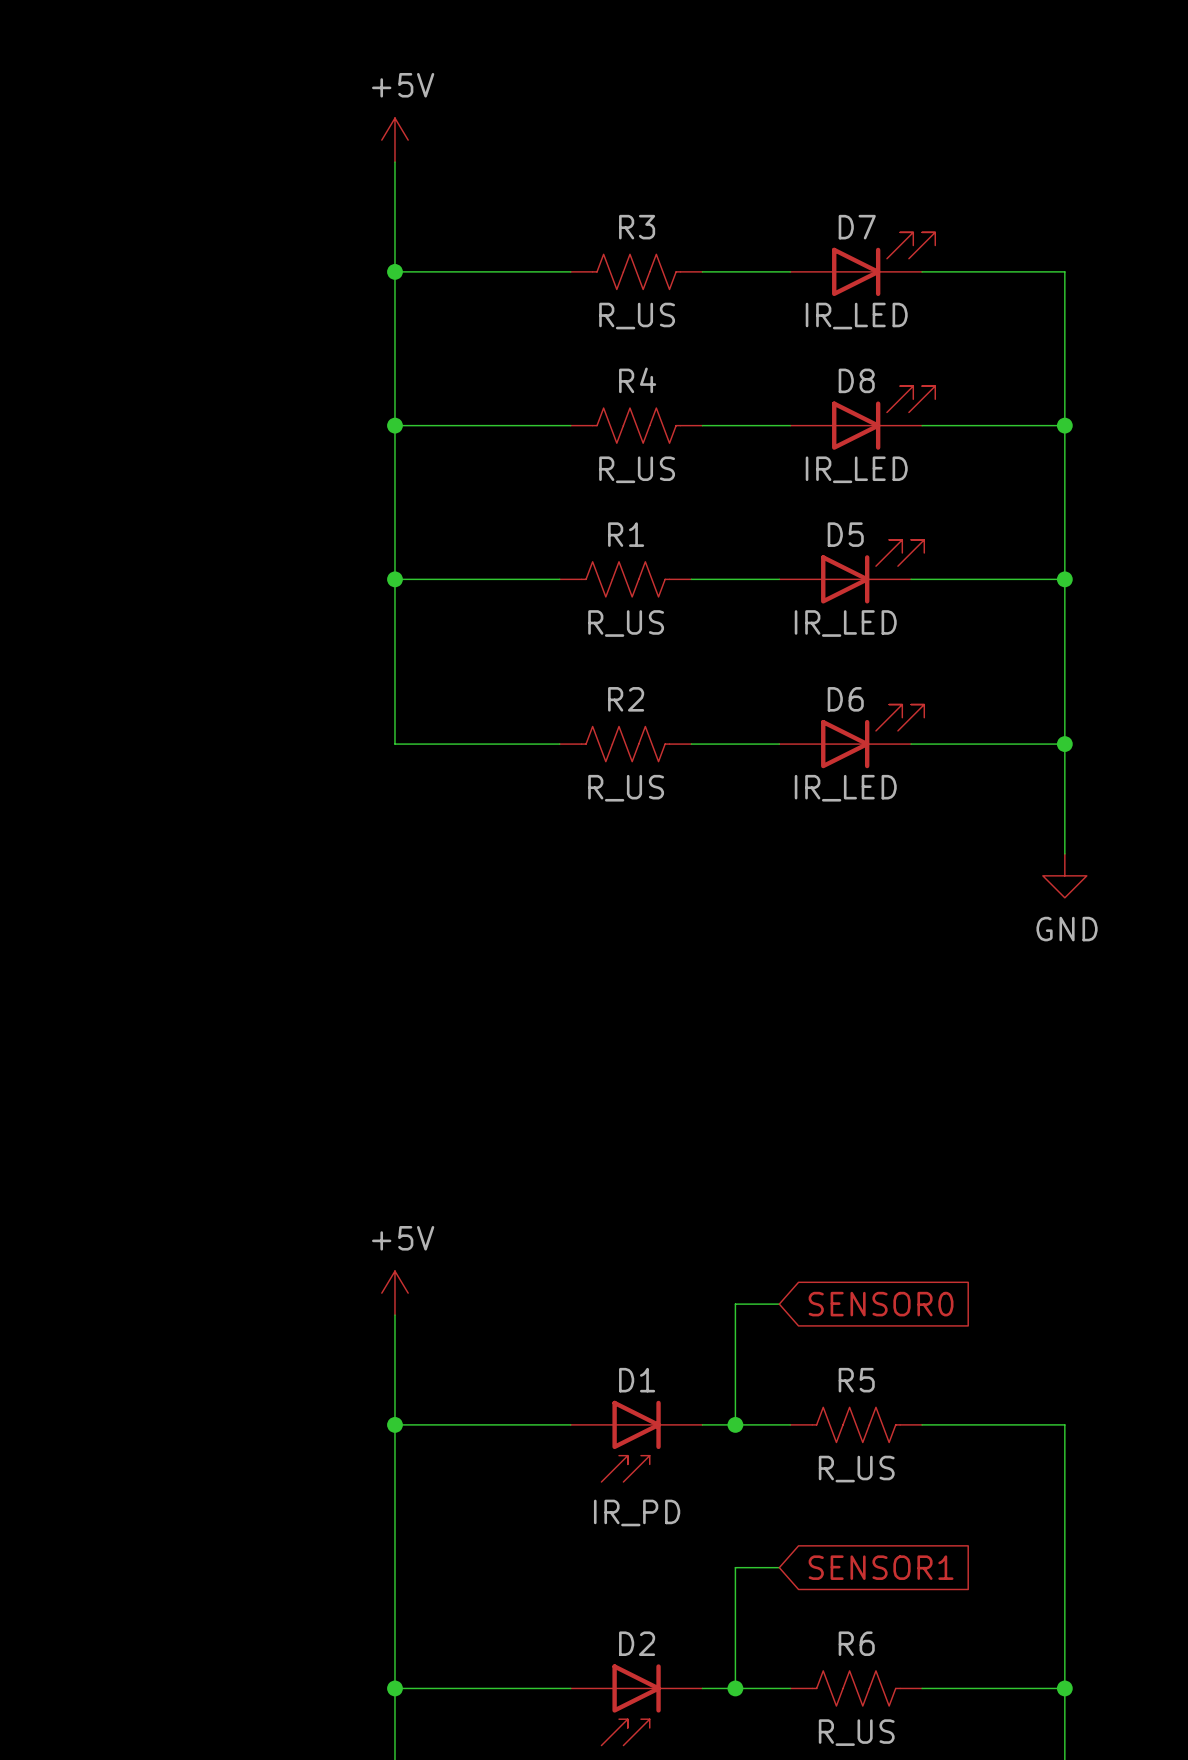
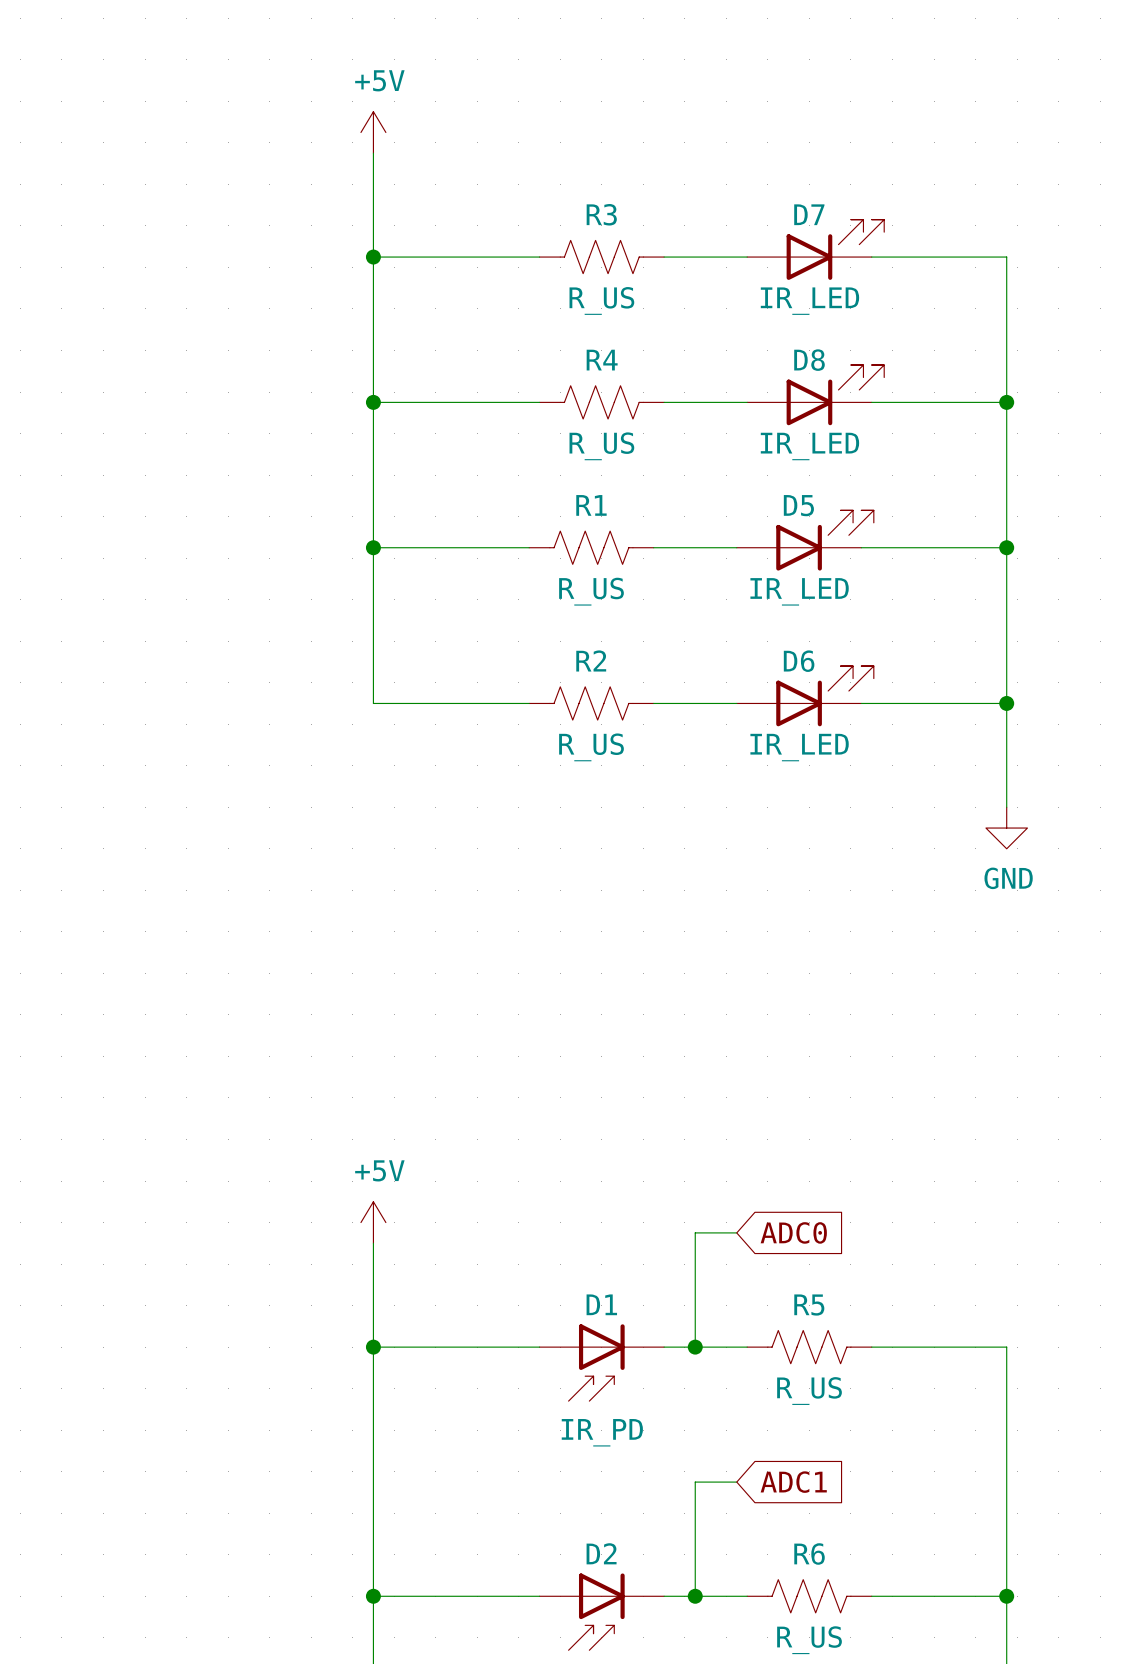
global label: SENSOR0 (881, 1304) -> ADC0 (793, 1232)
global label: SENSOR1 (881, 1567) -> ADC1 (793, 1482)

